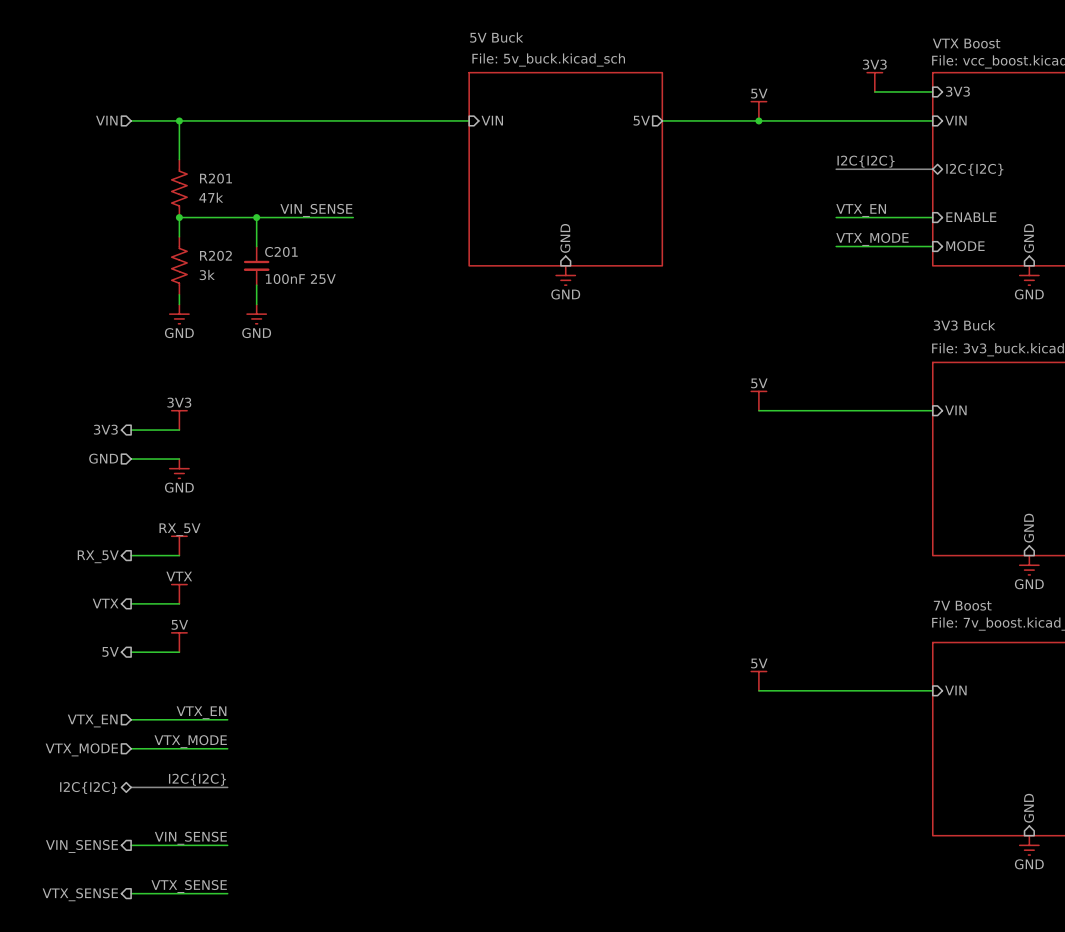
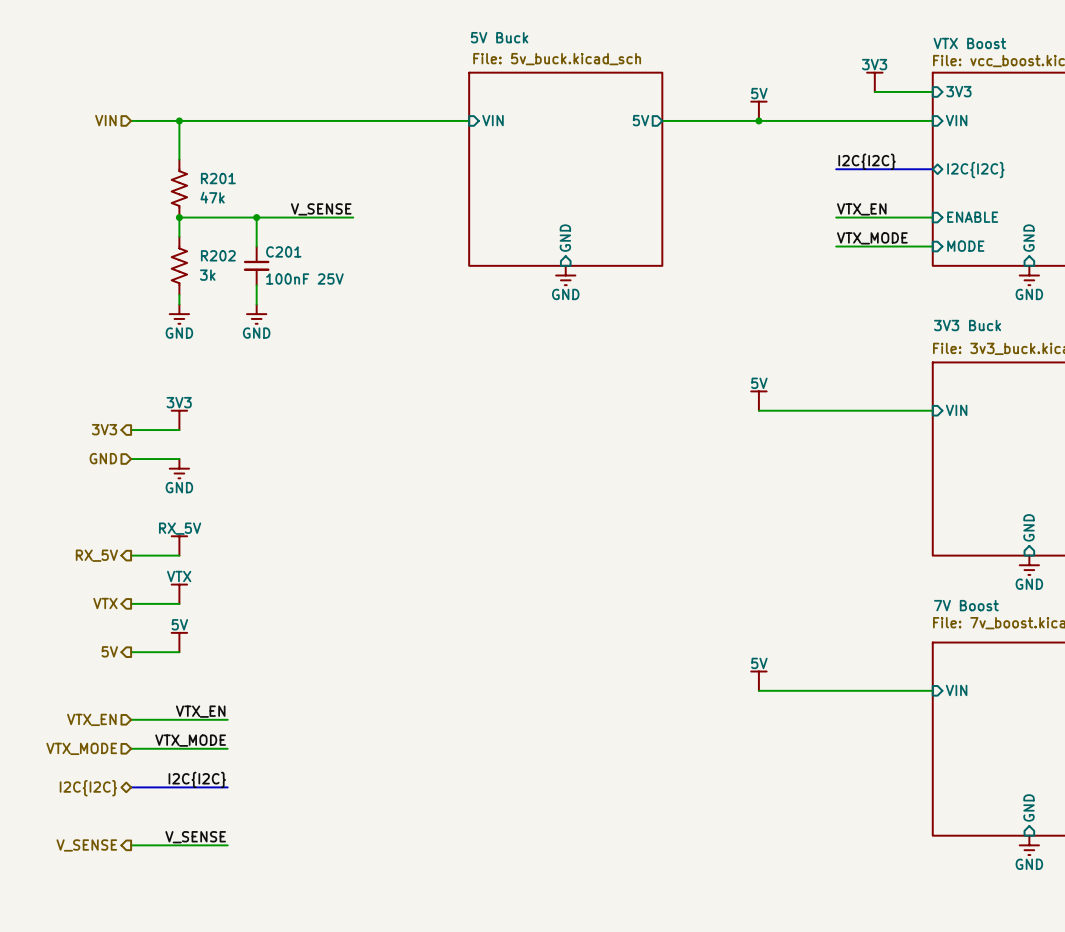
label: VIN_SENSE (316, 210) -> V_SENSE (321, 209)
label: VIN_SENSE (190, 838) -> V_SENSE (195, 837)
hierarchical label: VIN_SENSE (81, 846) -> V_SENSE (86, 845)
label: VTX_SENSE (189, 886) -> none
wire: (131, 893) (227, 893) -> none
hierarchical label: VTX_SENSE (80, 894) -> none

